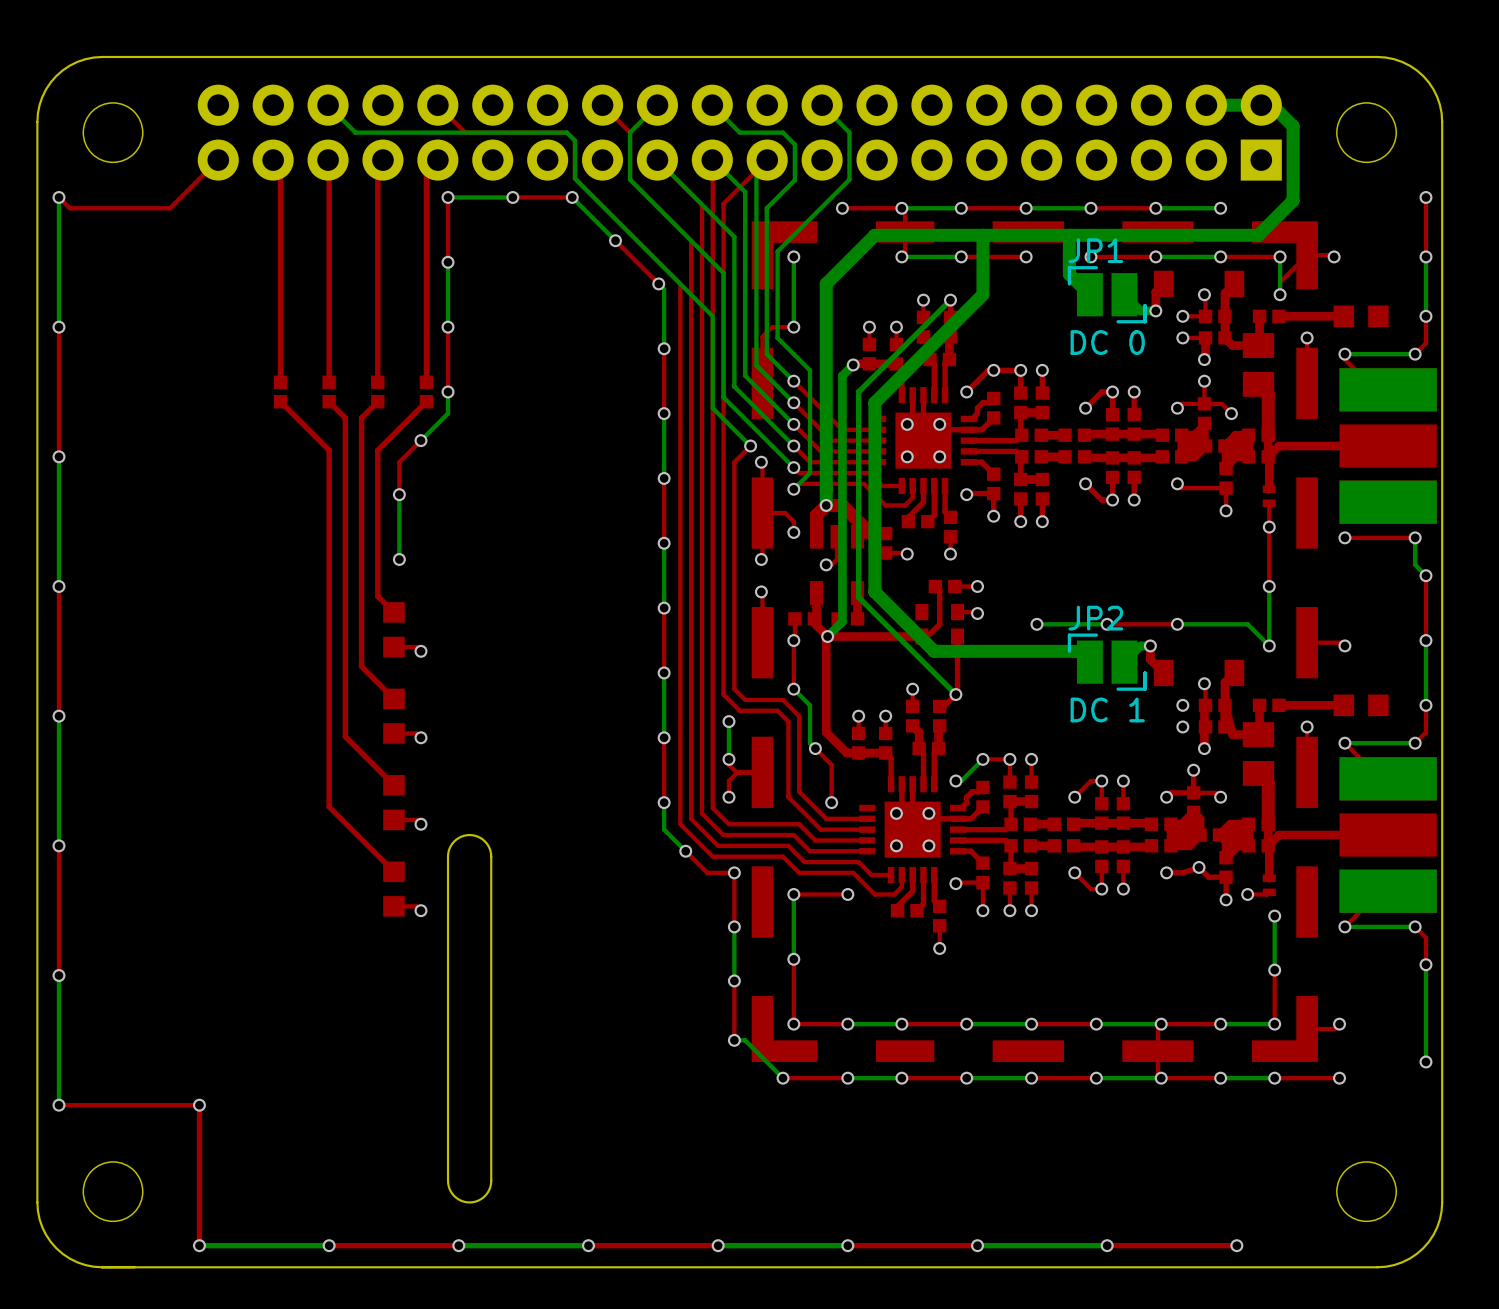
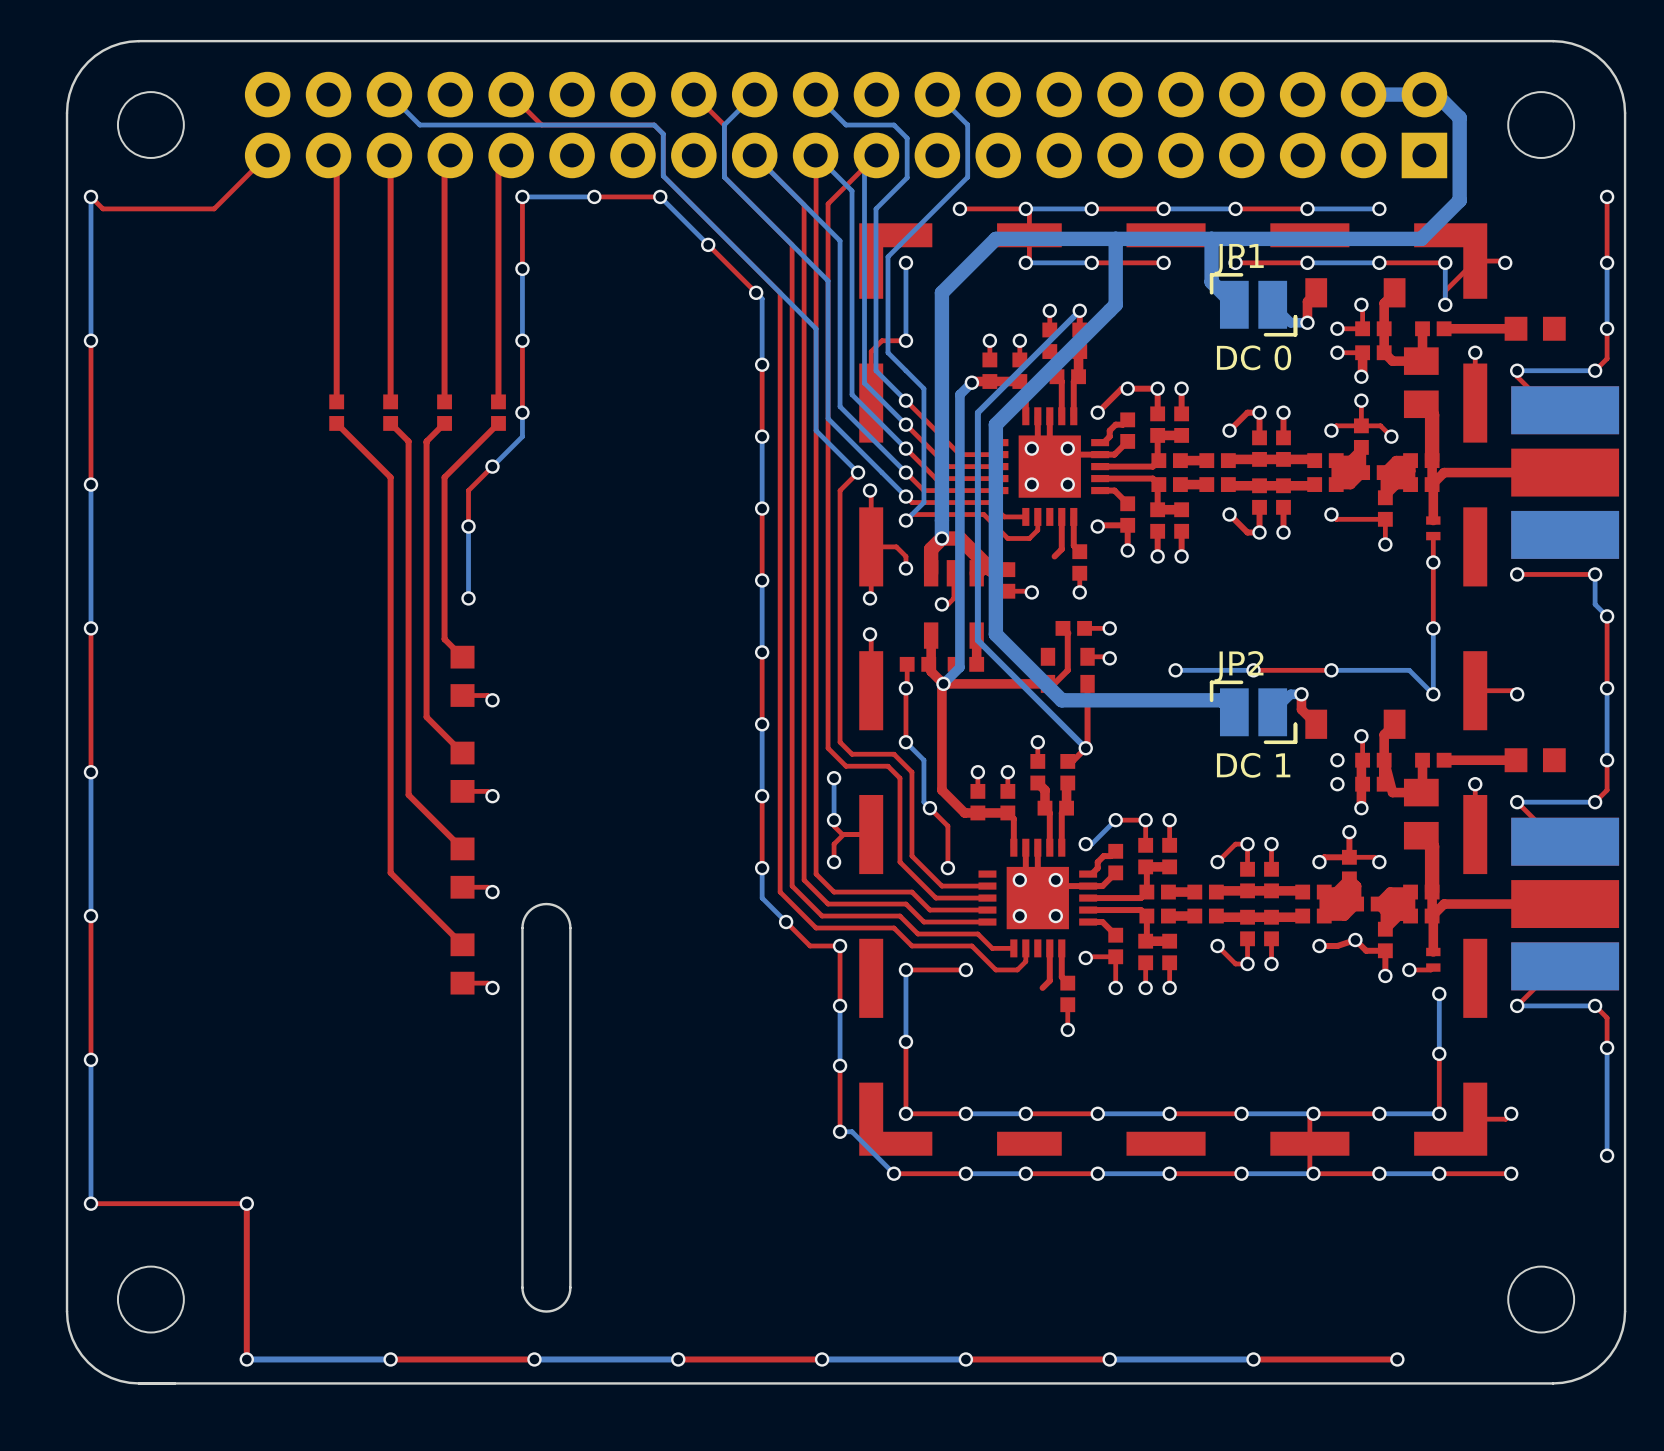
top track: (923, 485) (923, 502) (908, 517) (908, 521) -> none
part: (918, 521) -> none
top track: (912, 875) (912, 891) (897, 906) (897, 910) -> none
part: (907, 910) -> none

